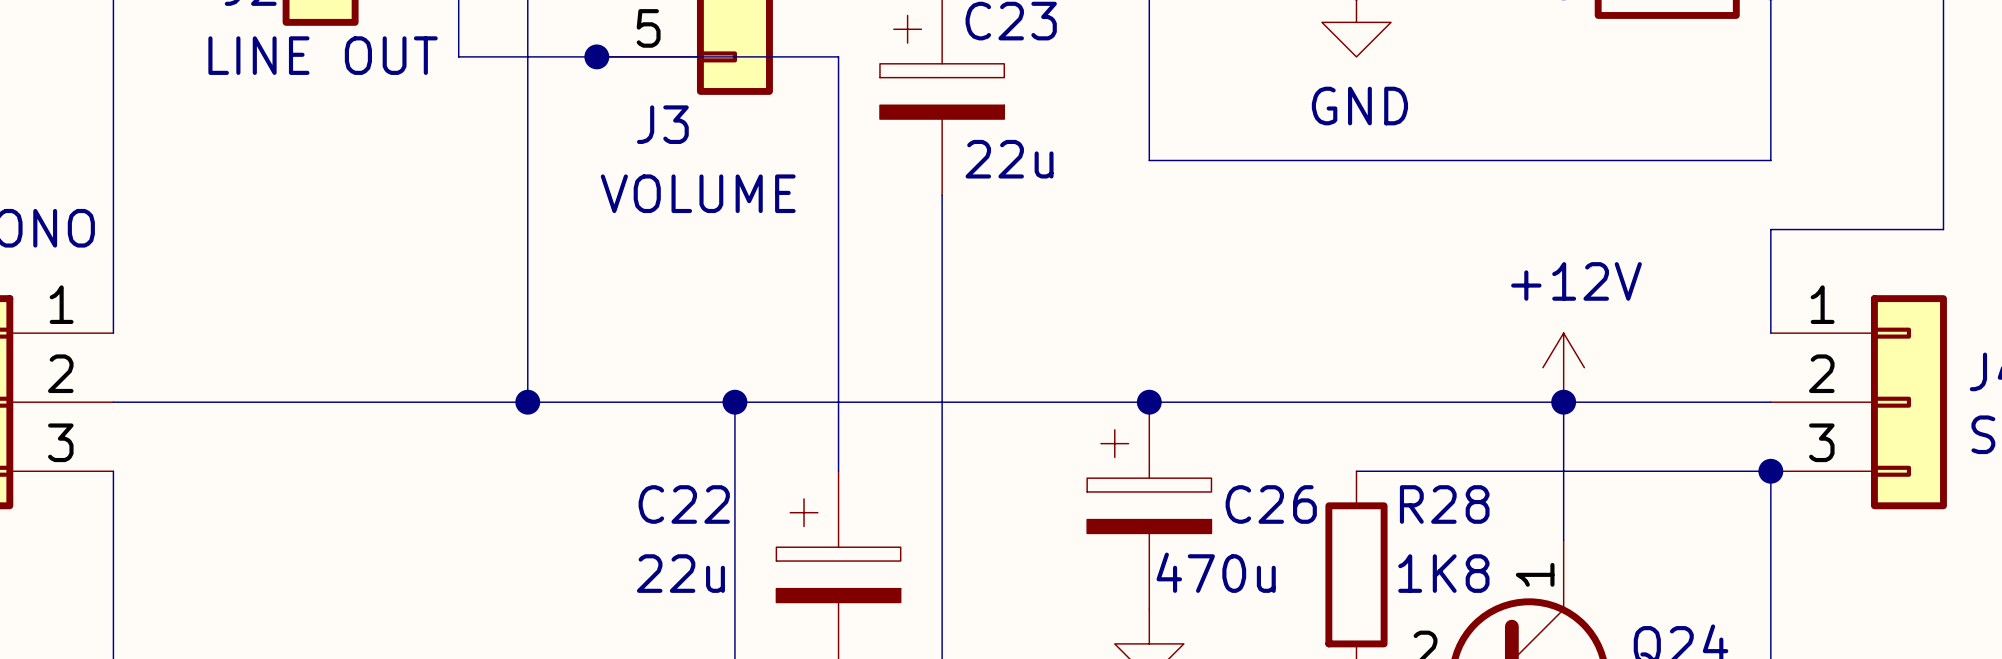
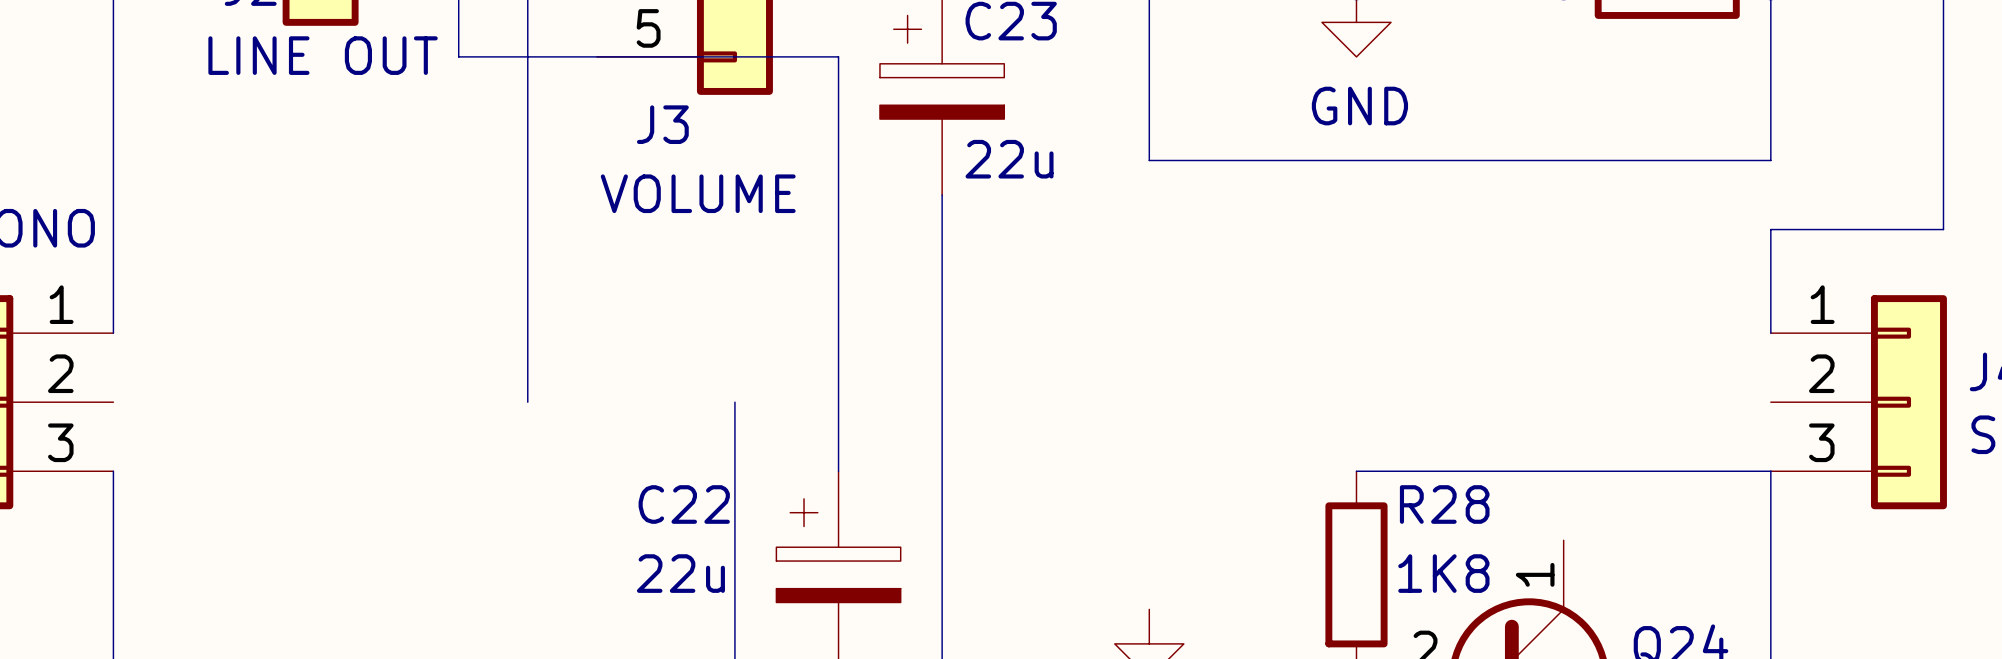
junction: (596, 56) -> none
power symbol: +12V (1563, 367) -> none
wire: (113, 402) (1770, 402) -> none
junction: (527, 402) -> none
junction: (734, 402) -> none
junction: (1149, 402) -> none
wire: (1563, 402) (1563, 540) -> none
junction: (1563, 402) -> none
junction: (1770, 471) -> none
C26: 470u (1149, 505) -> none

